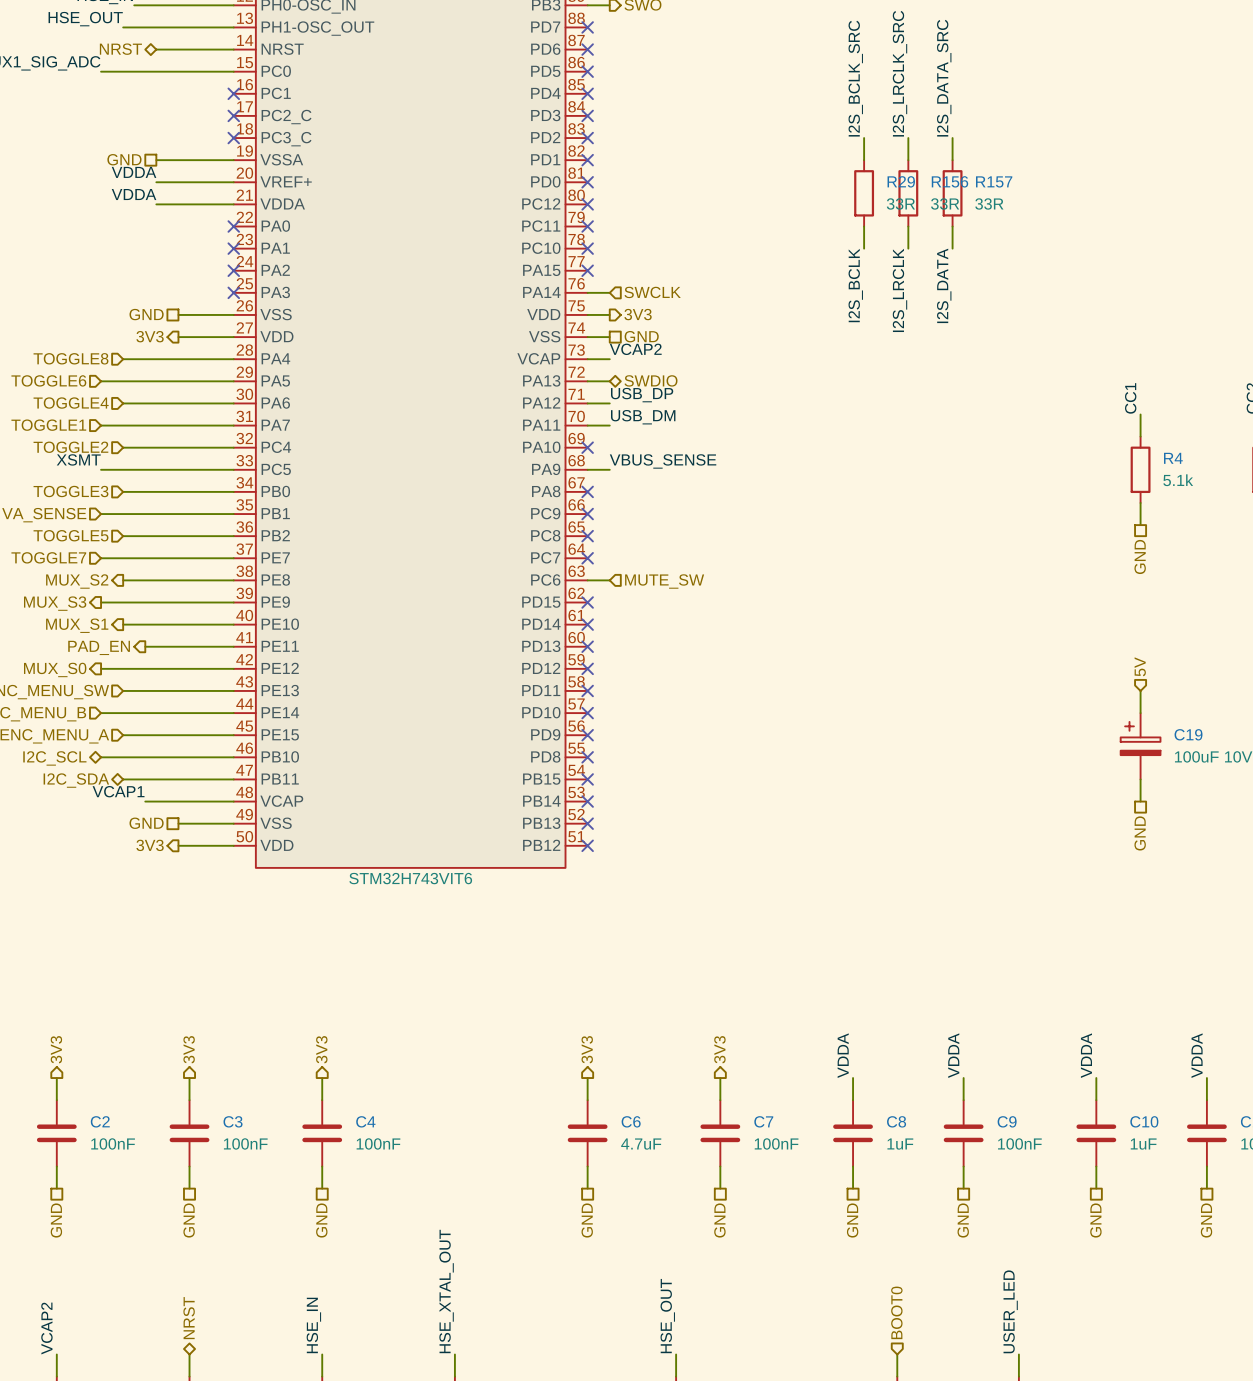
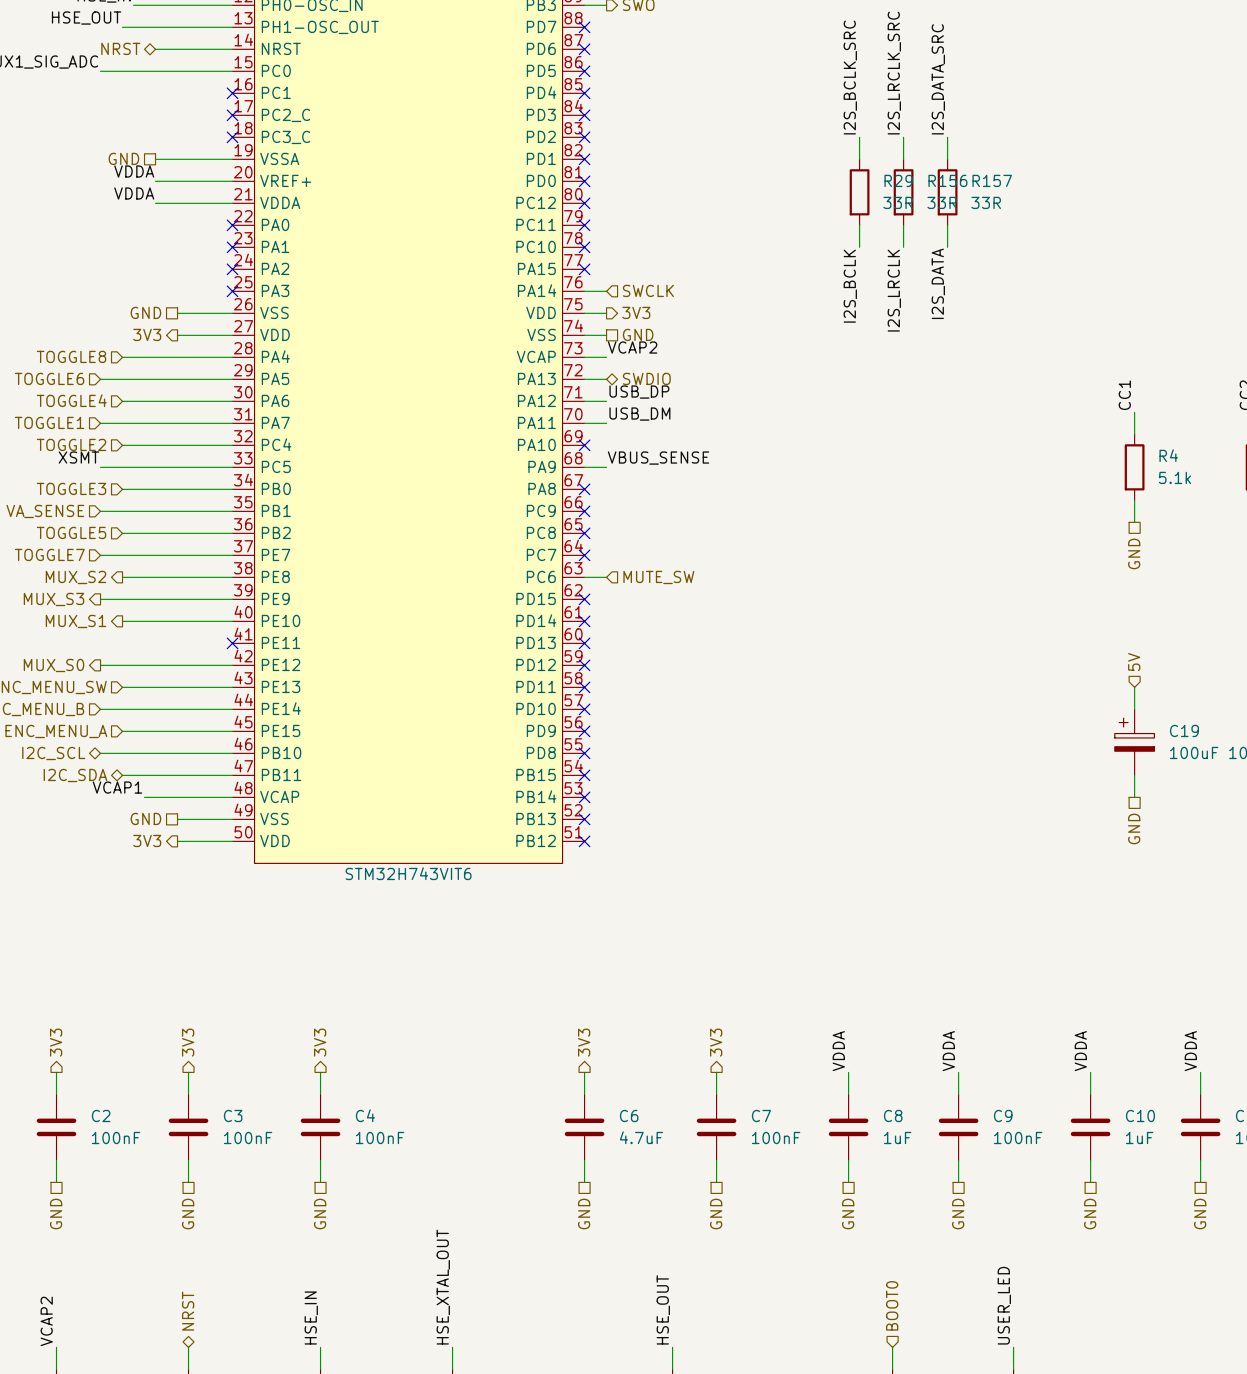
wire: (145, 646) (233, 646) -> none
no-connect mark: none -> (232, 643)
hierarchical label: PAD_EN (99, 647) -> none

